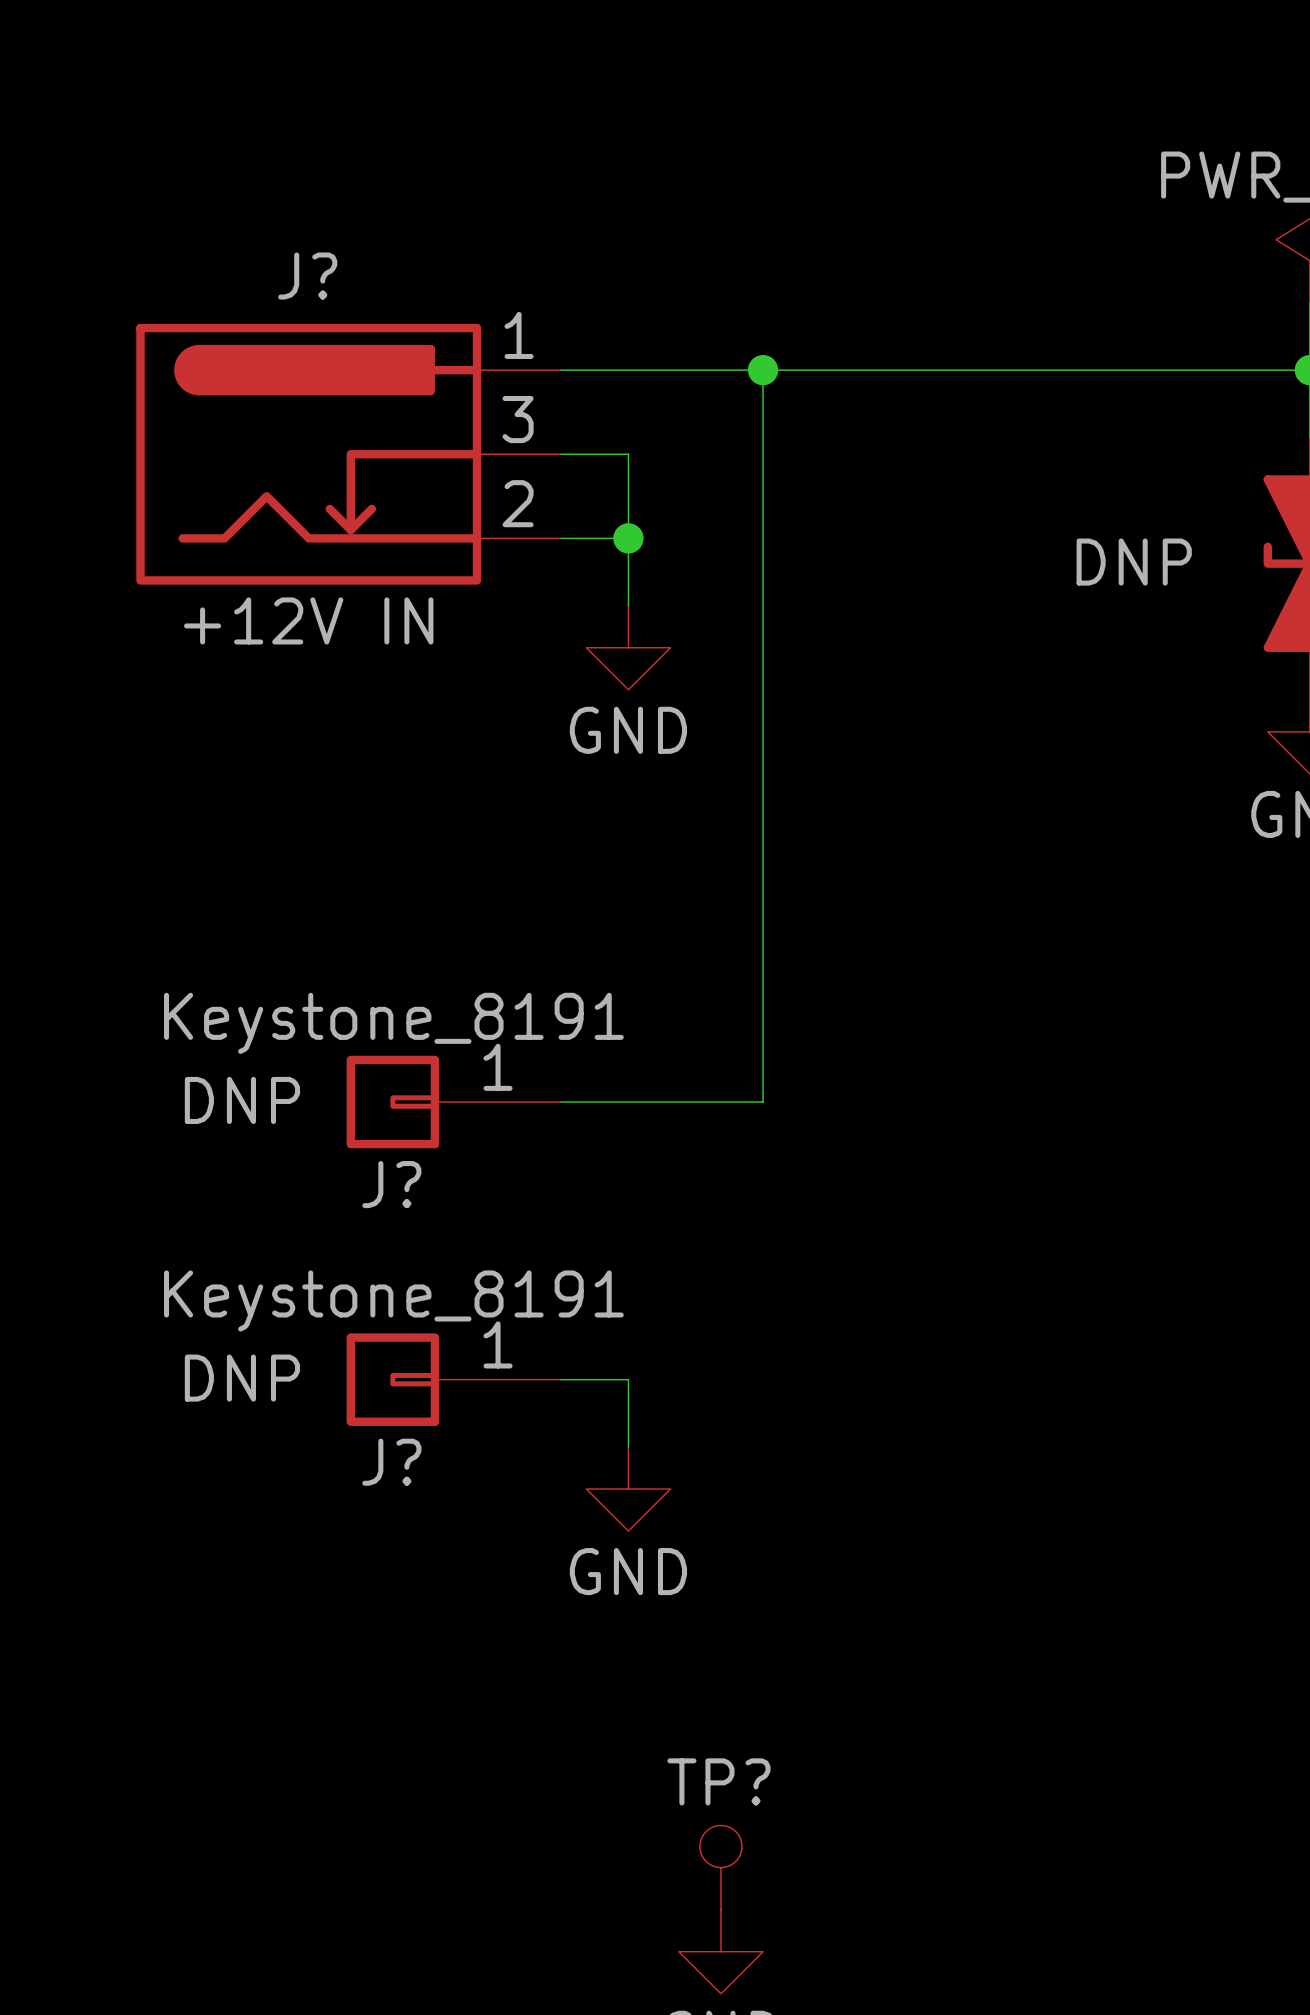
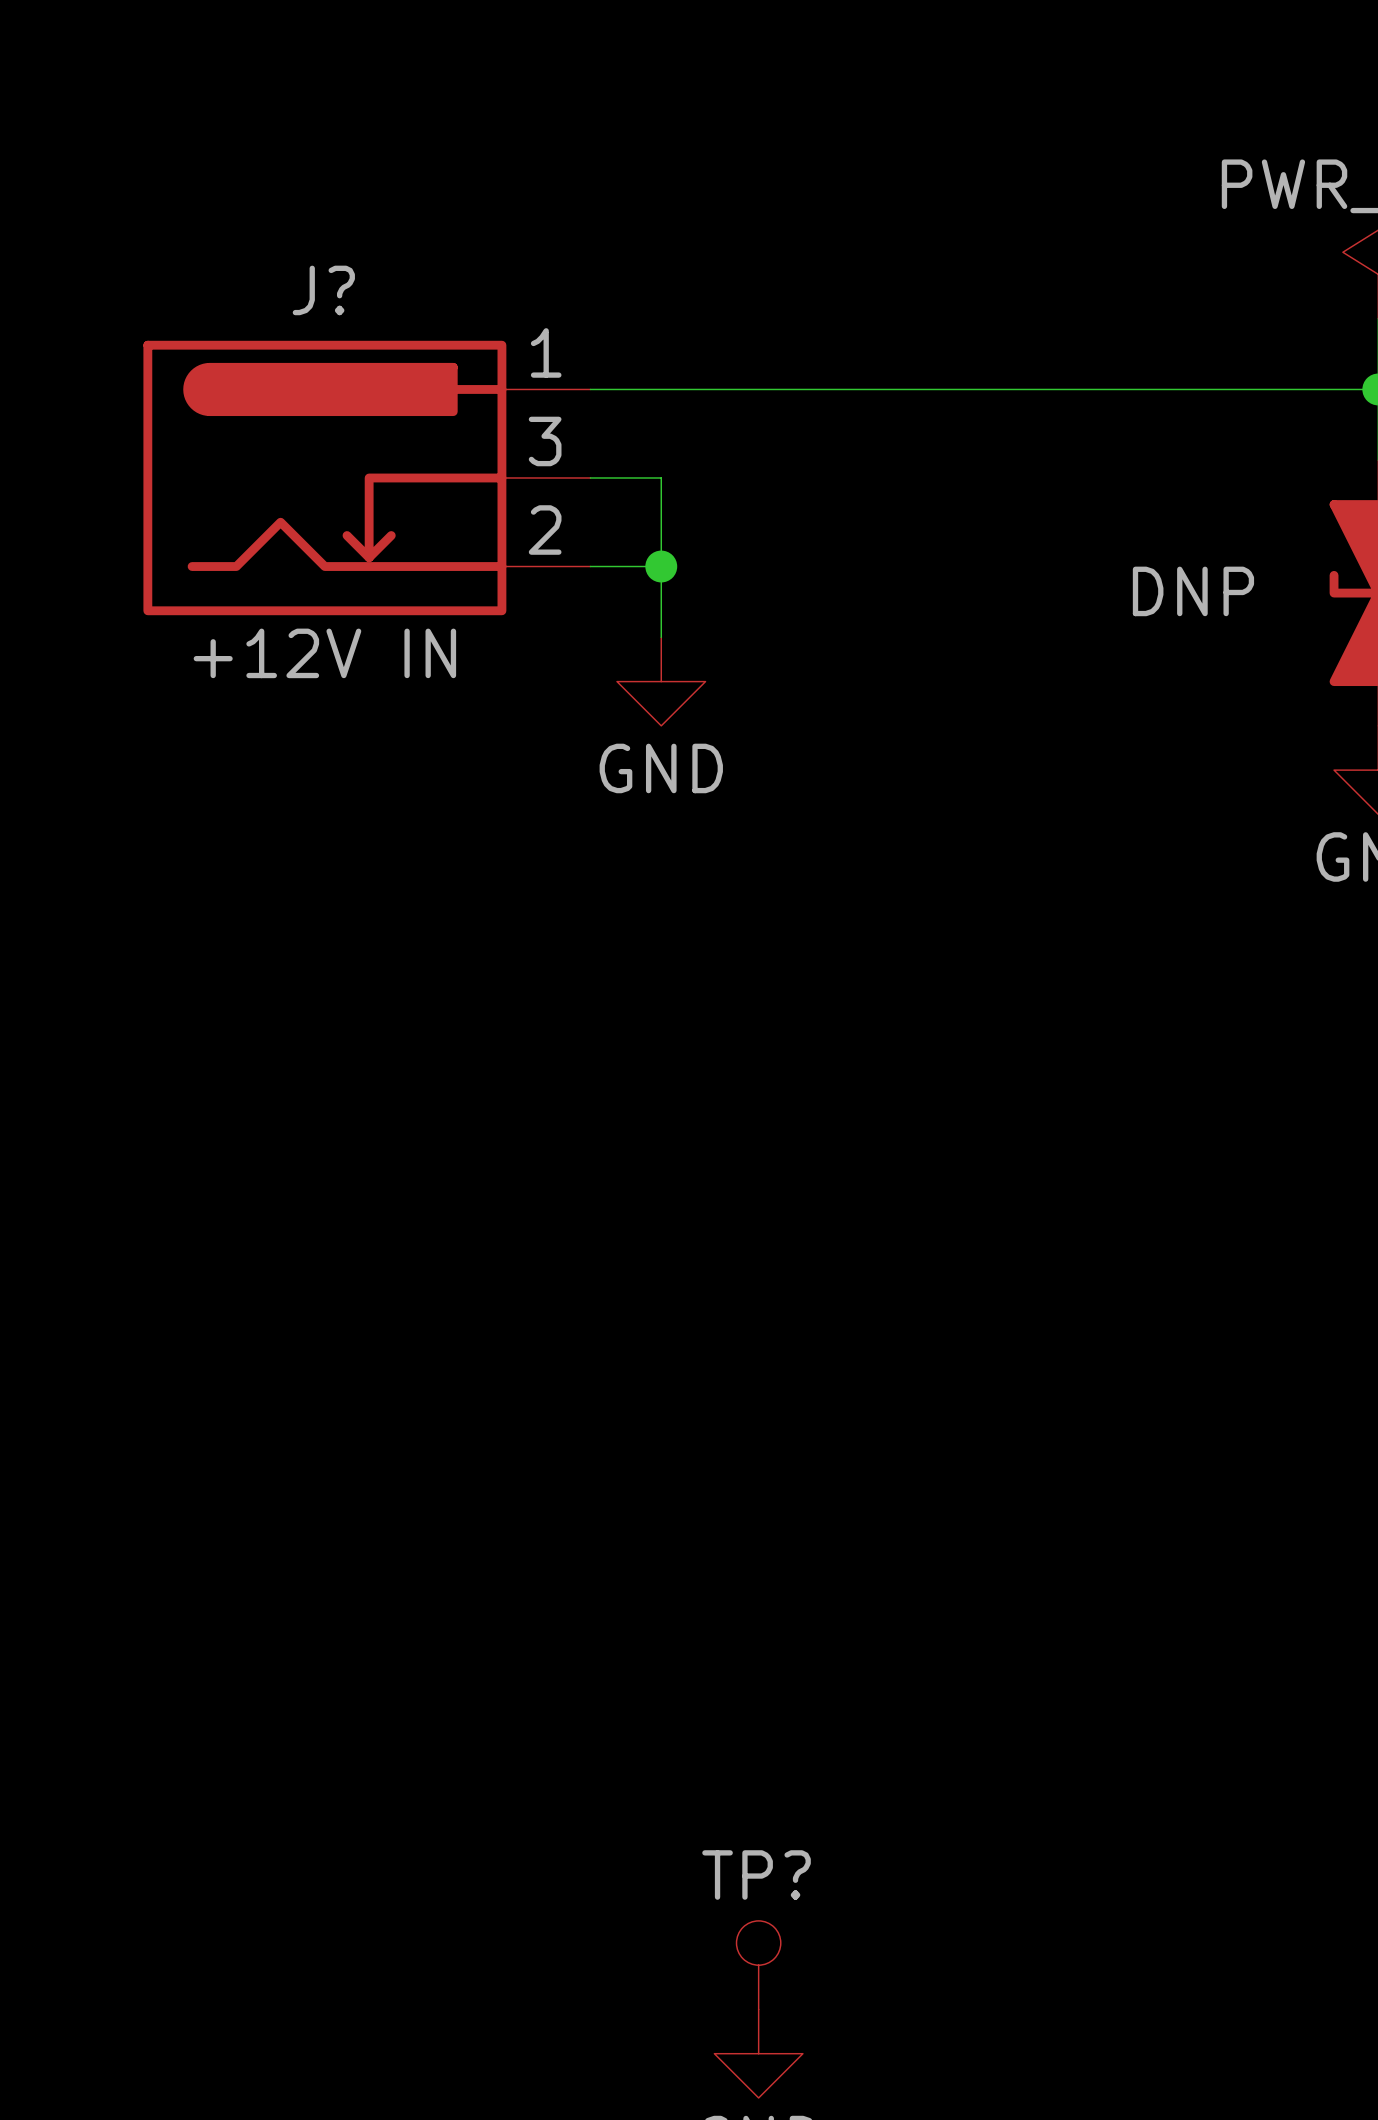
wire: (763, 370) (763, 1102) (561, 1102) -> none
junction: (763, 370) -> none
J?: Keystone_8191 (453, 1102) -> none
J?: Keystone_8191 (453, 1379) -> none
wire: (561, 1379) (628, 1379) (628, 1446) -> none
power symbol: GND (628, 1489) -> none

